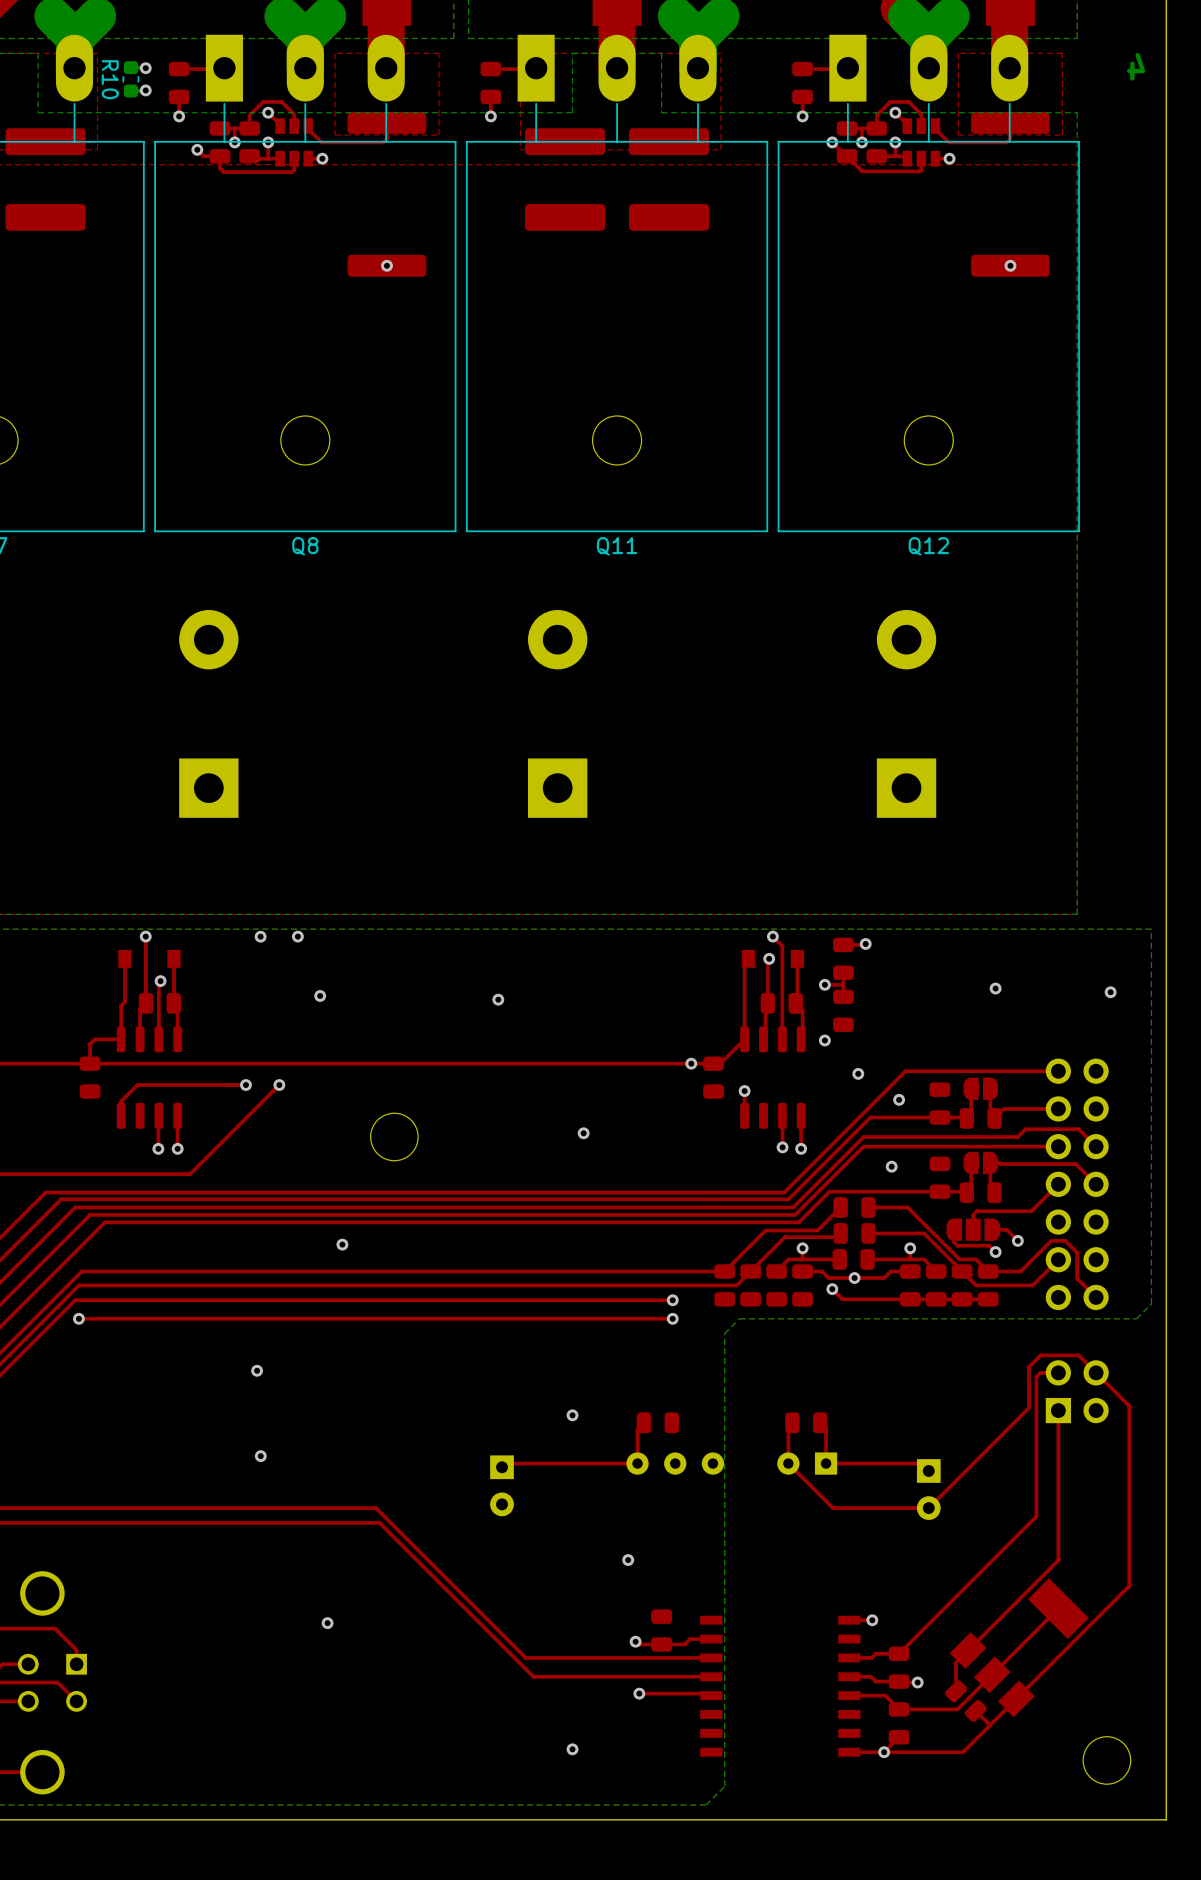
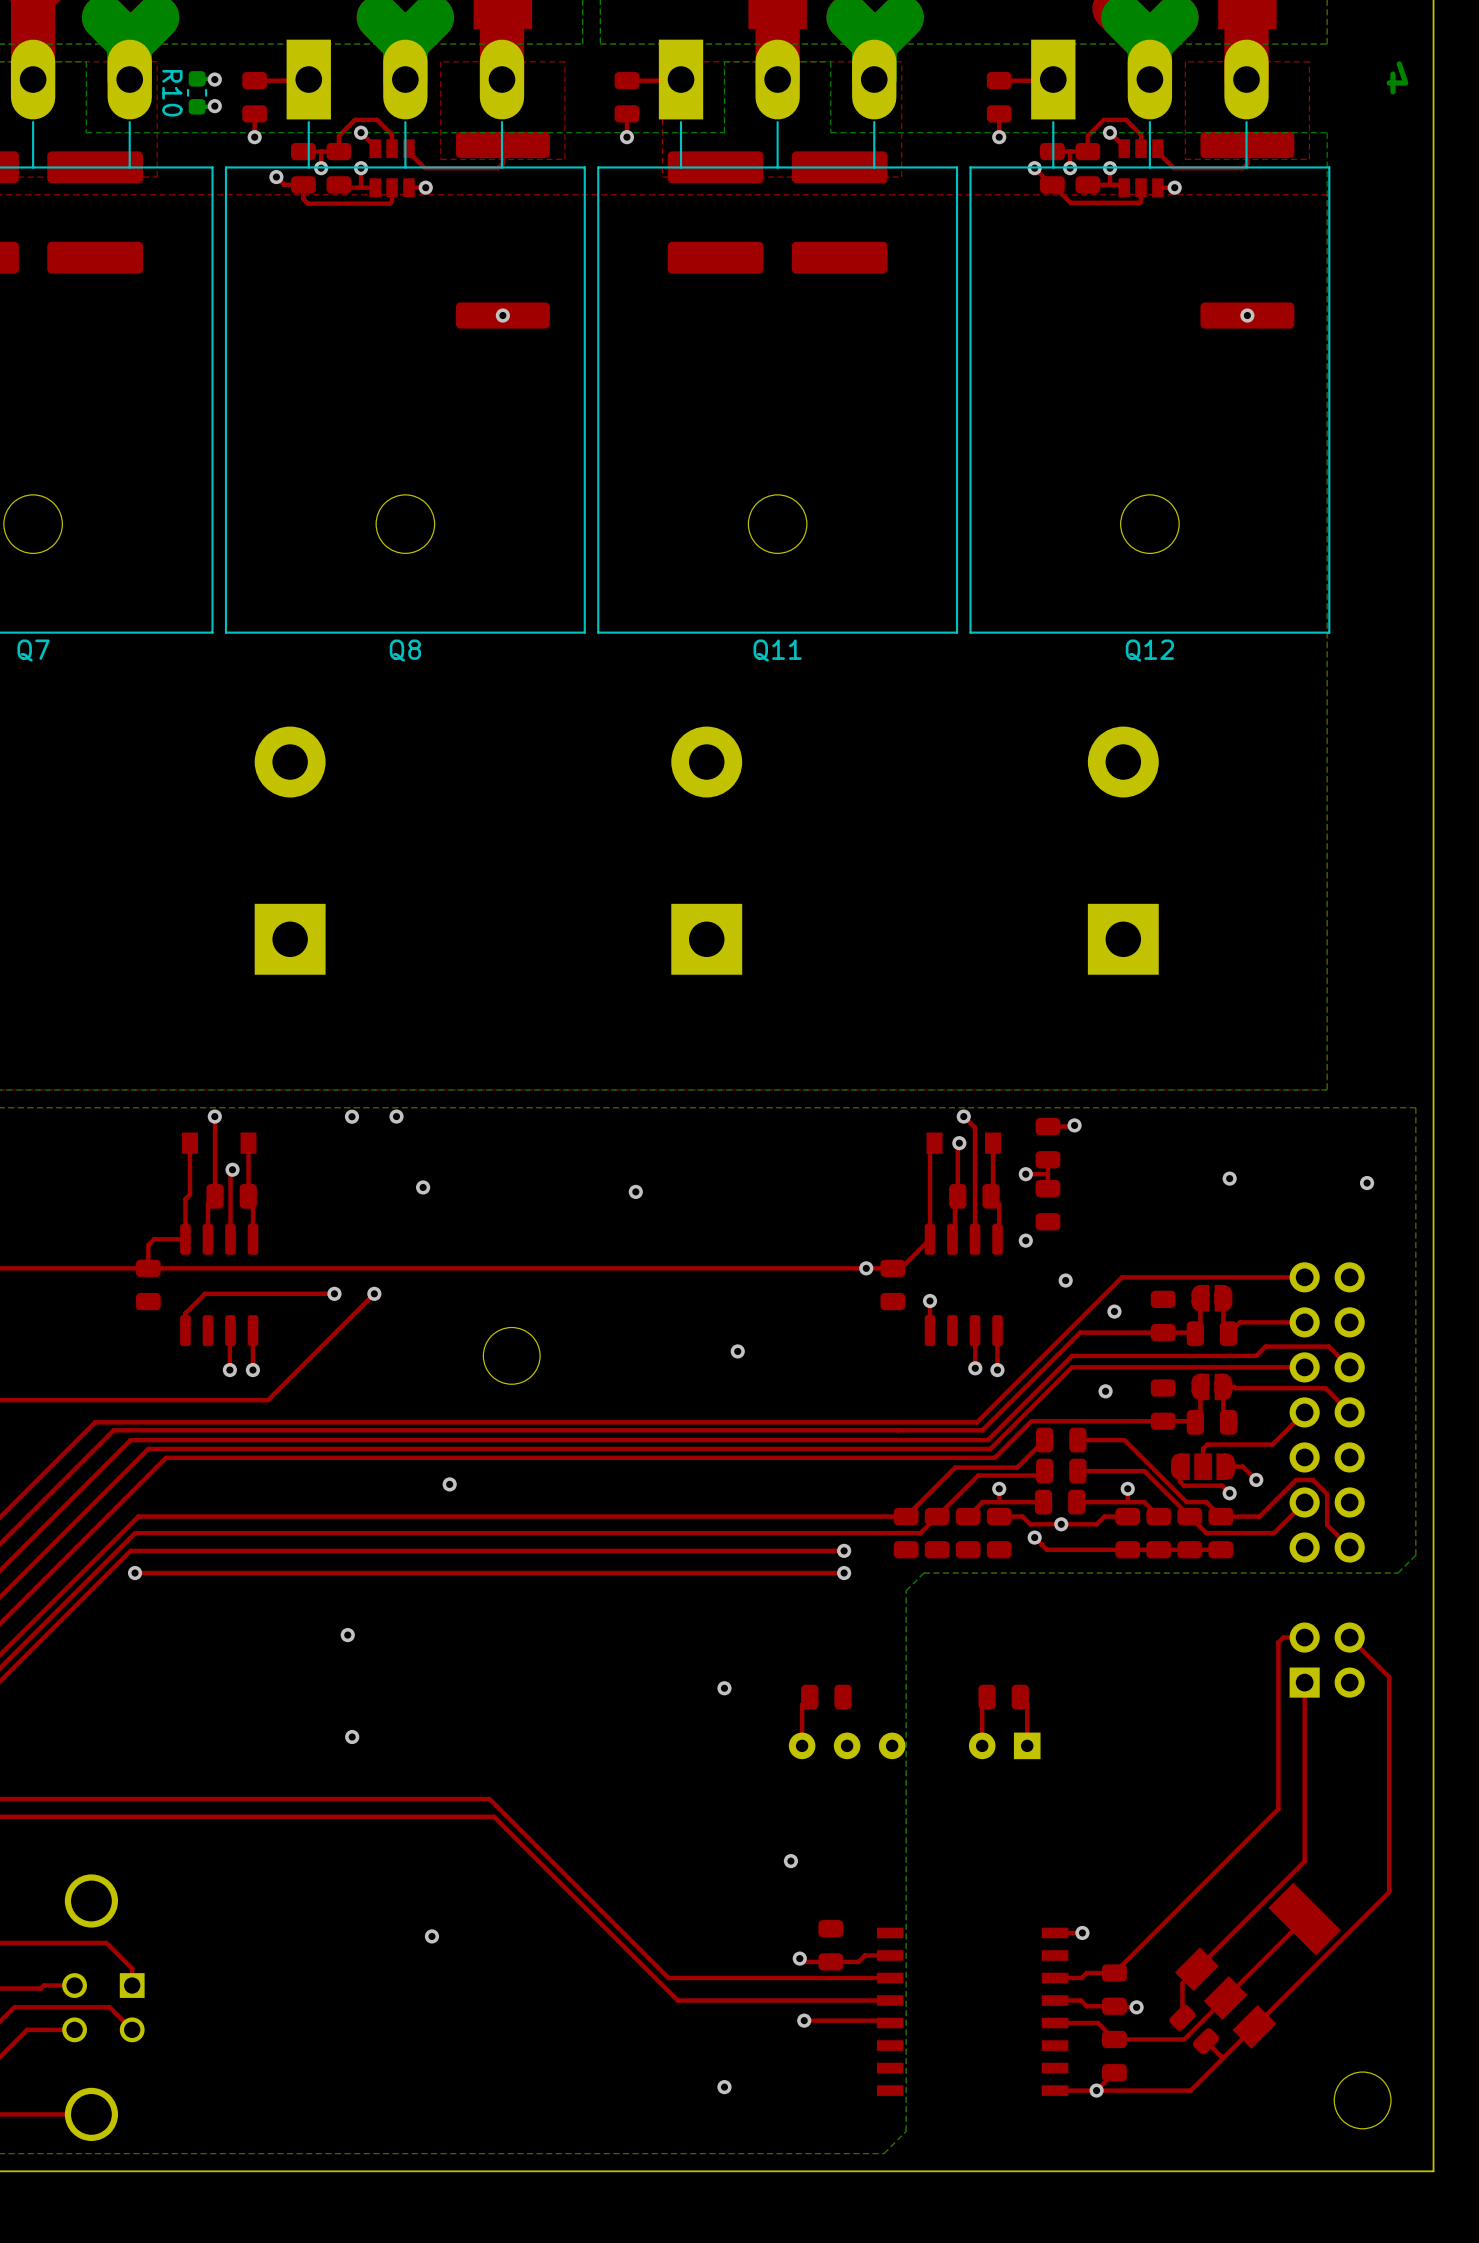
top track: (1096, 1372) (1078, 1355) (1040, 1355) (1028, 1367) (1028, 1407) (928, 1508) (832, 1508) (788, 1463) -> none
top track: (637, 1463) (505, 1463) (502, 1467) -> none
top track: (826, 1463) (921, 1463) (928, 1470) -> none
part: (502, 1485) -> none
part: (928, 1489) -> none

